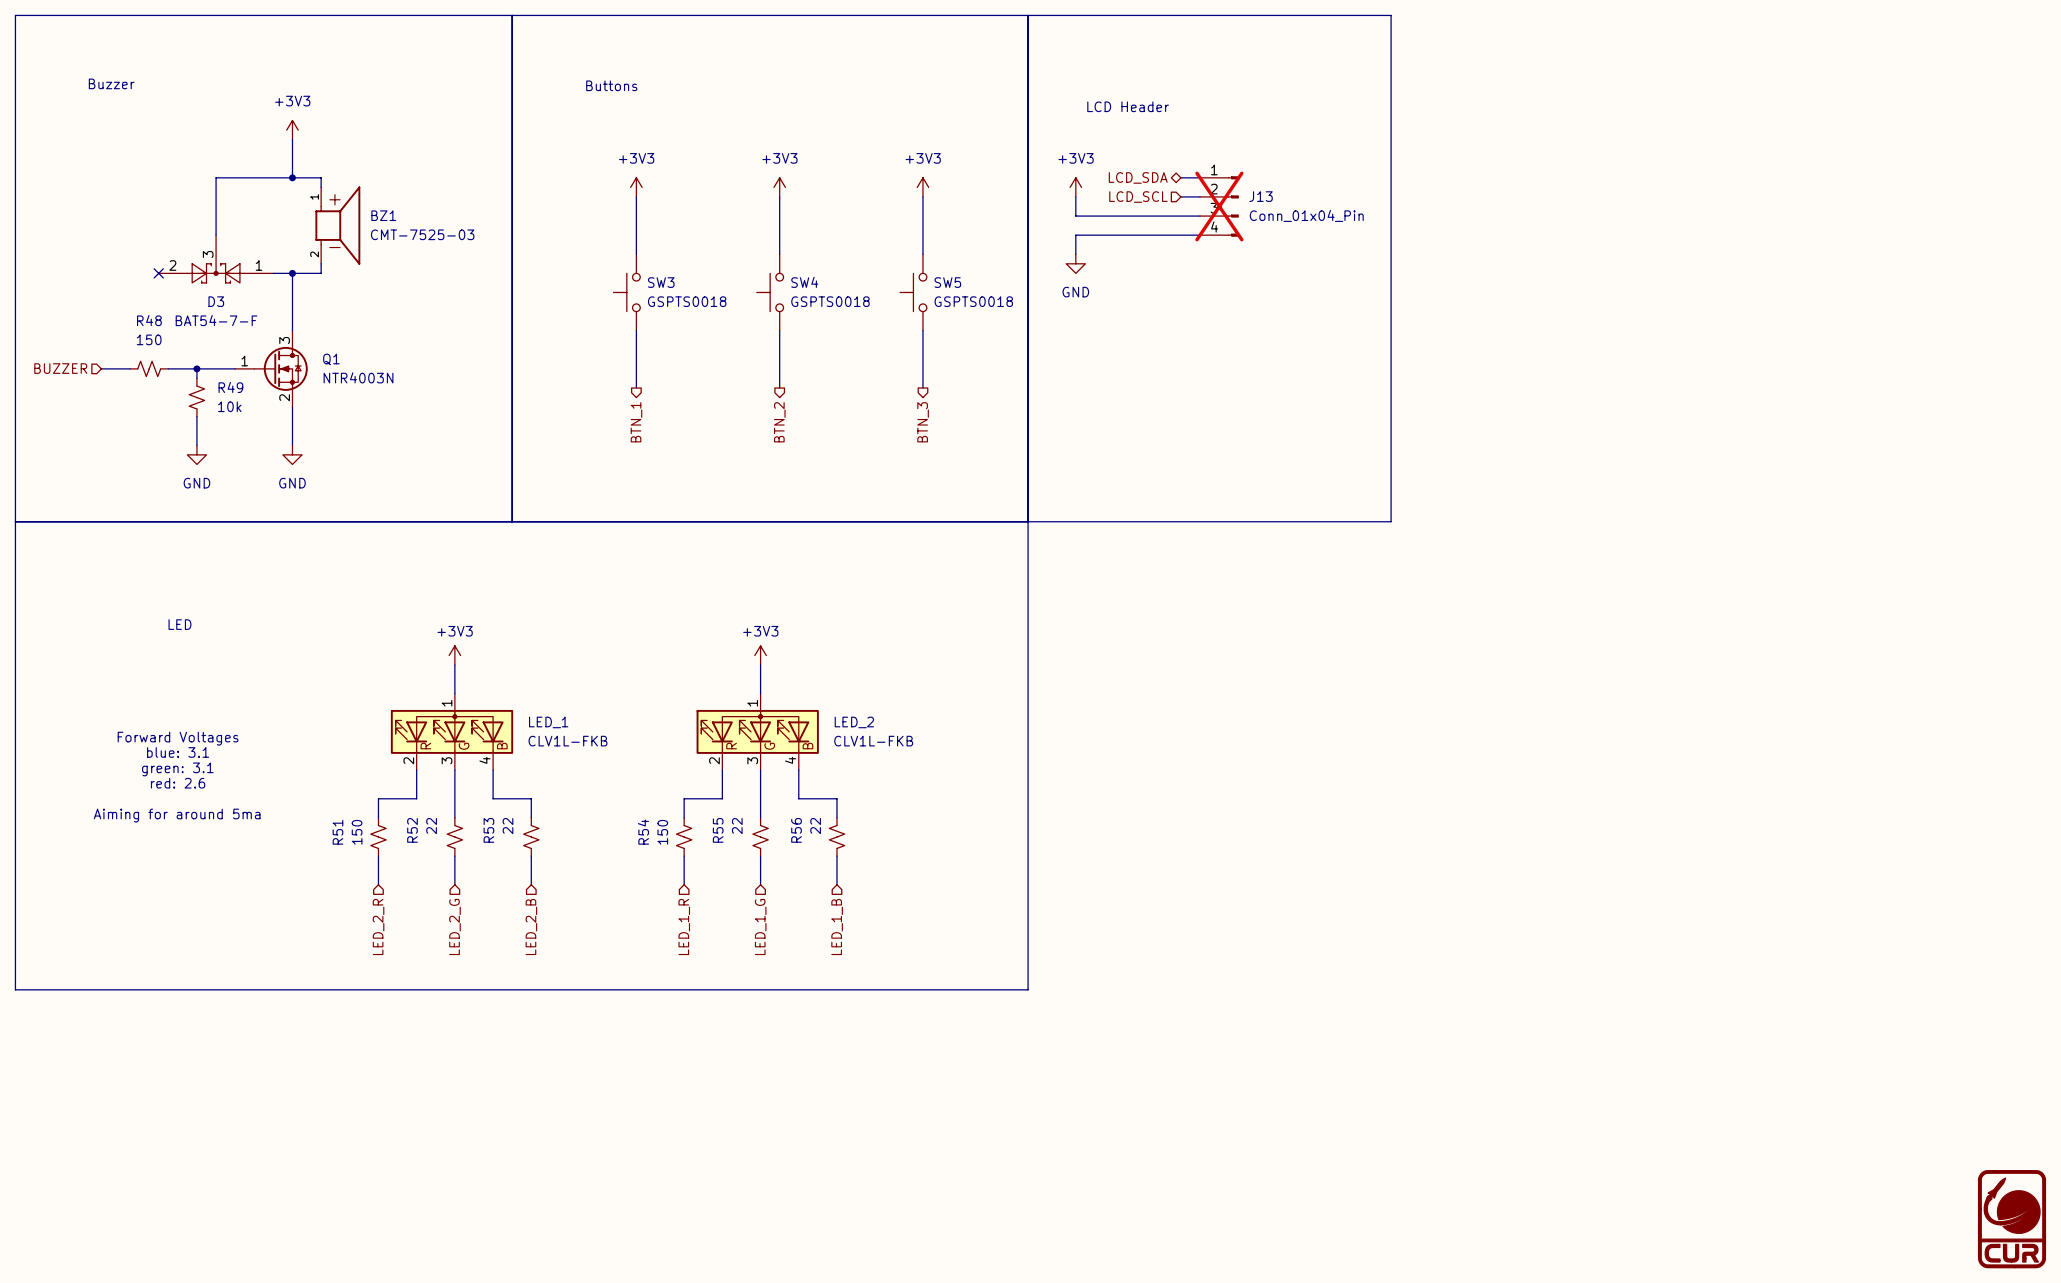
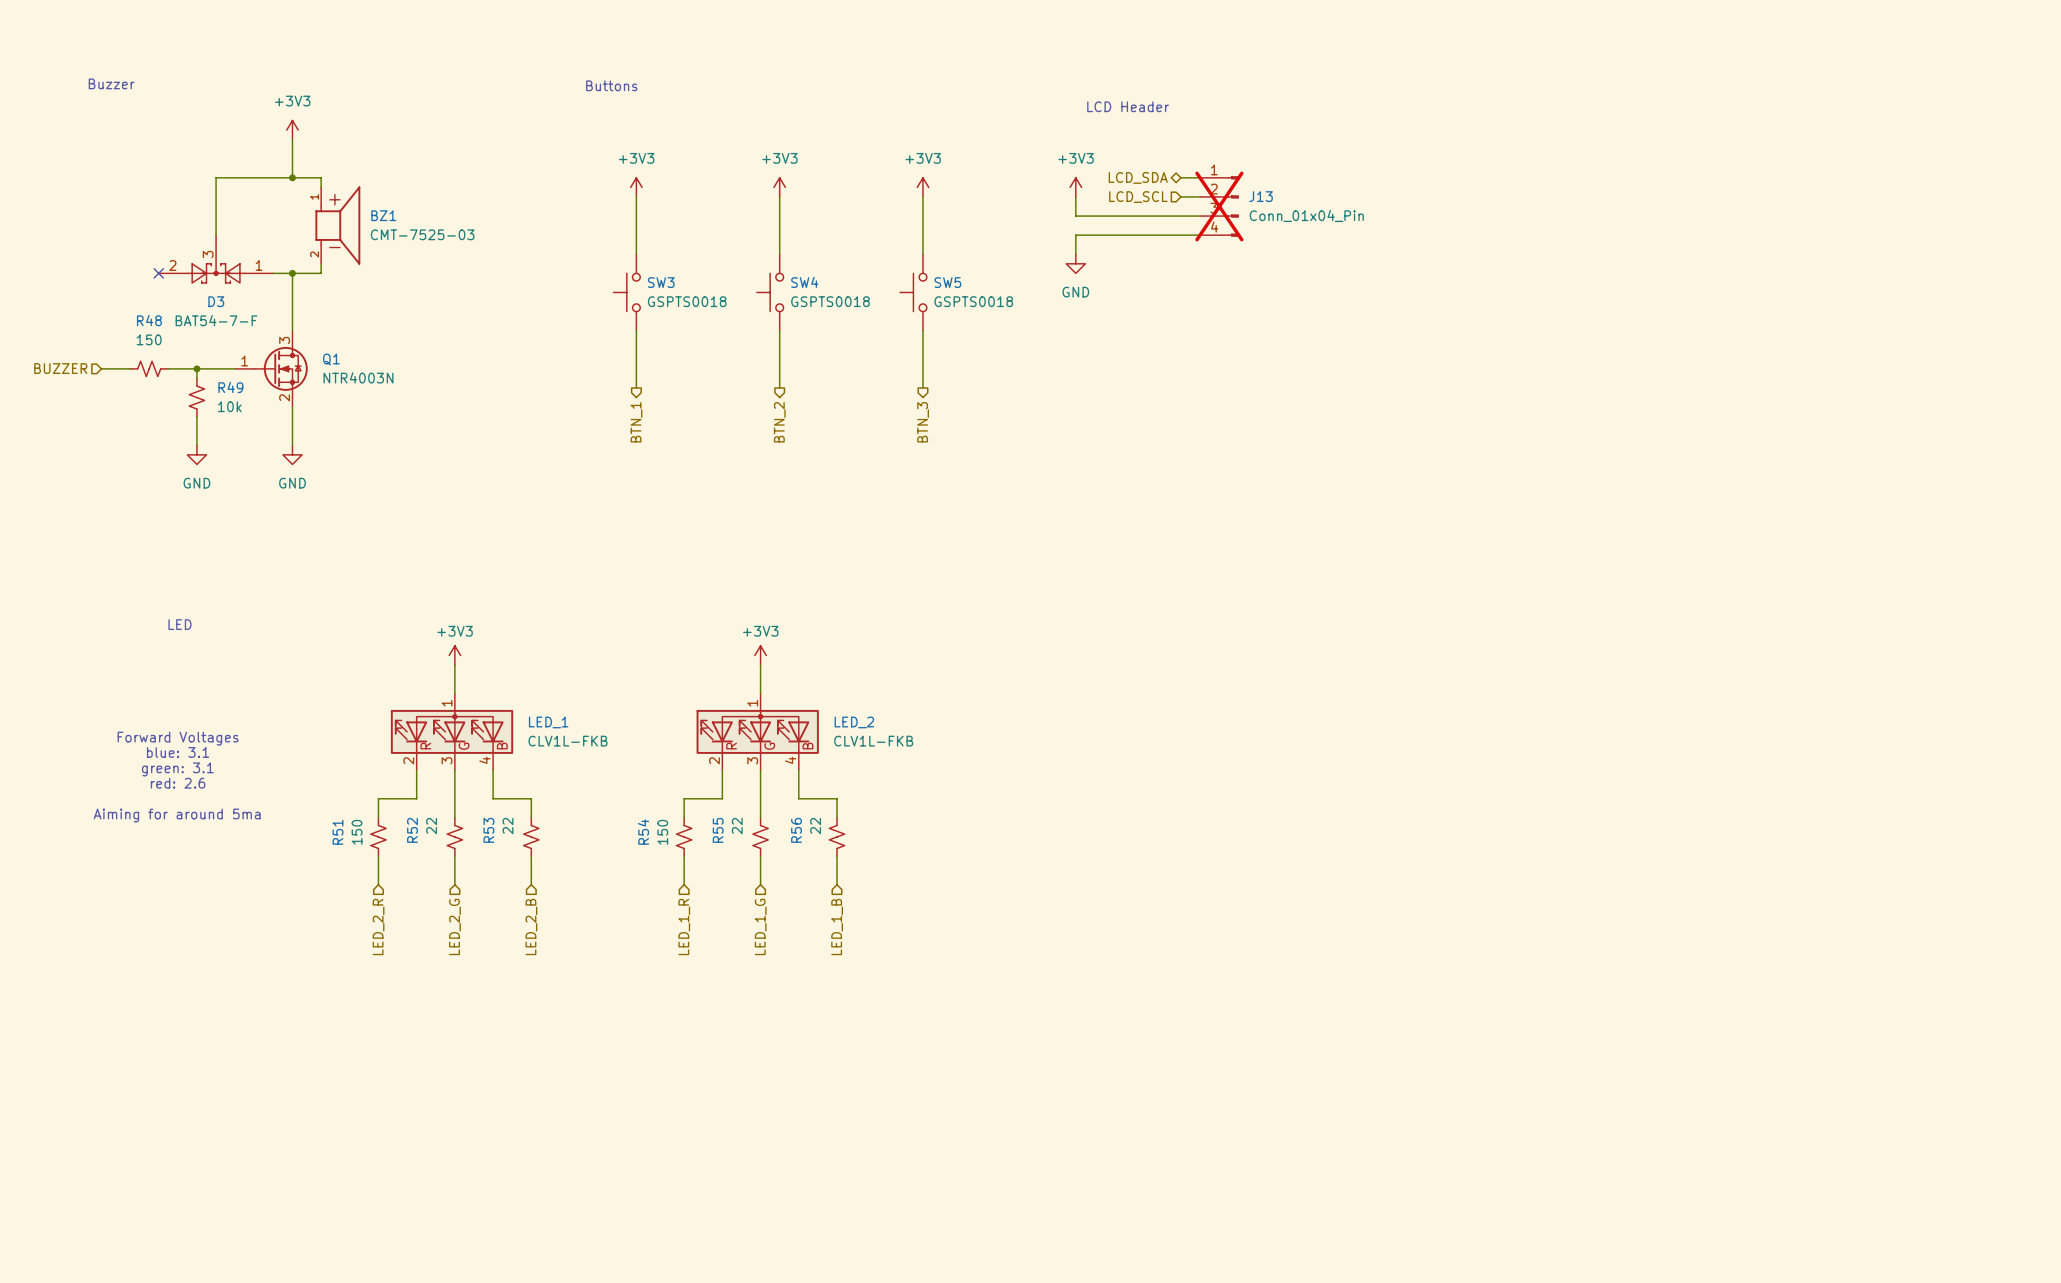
line: (512, 15) (512, 521) -> none
line: (1028, 15) (1028, 989) (15, 989) (15, 15) (1391, 15) (1391, 521) (15, 521) -> none
power symbol: (2011, 1219) -> none

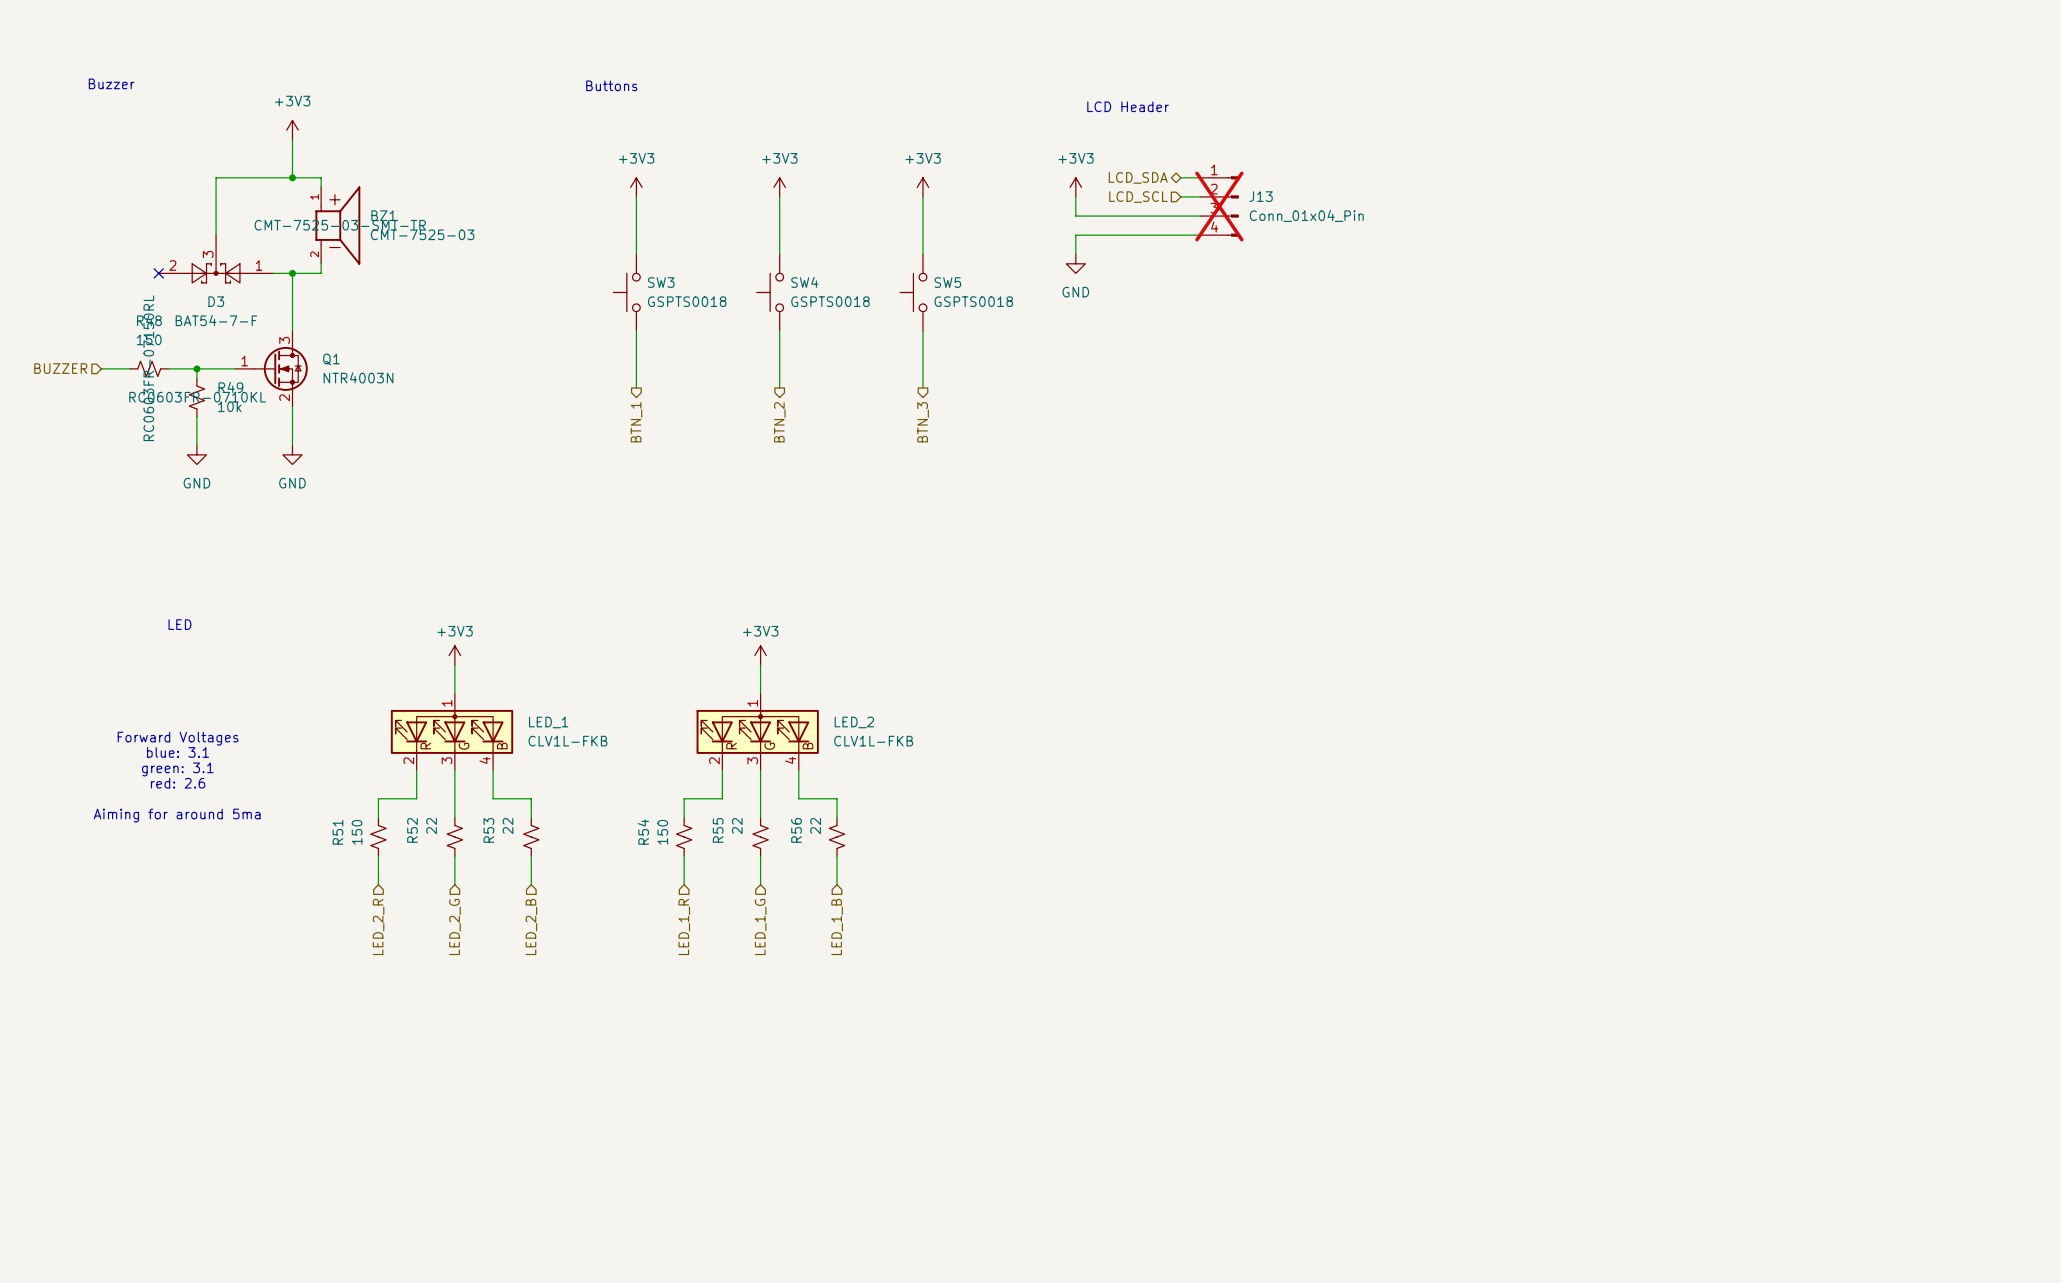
BZ1 text: none -> CMT-7525-03-SMT-TR (340, 225)
R48 text: none -> RC0603FR-07150RL (148, 368)
R49 text: none -> RC0603FR-0710KL (197, 397)

